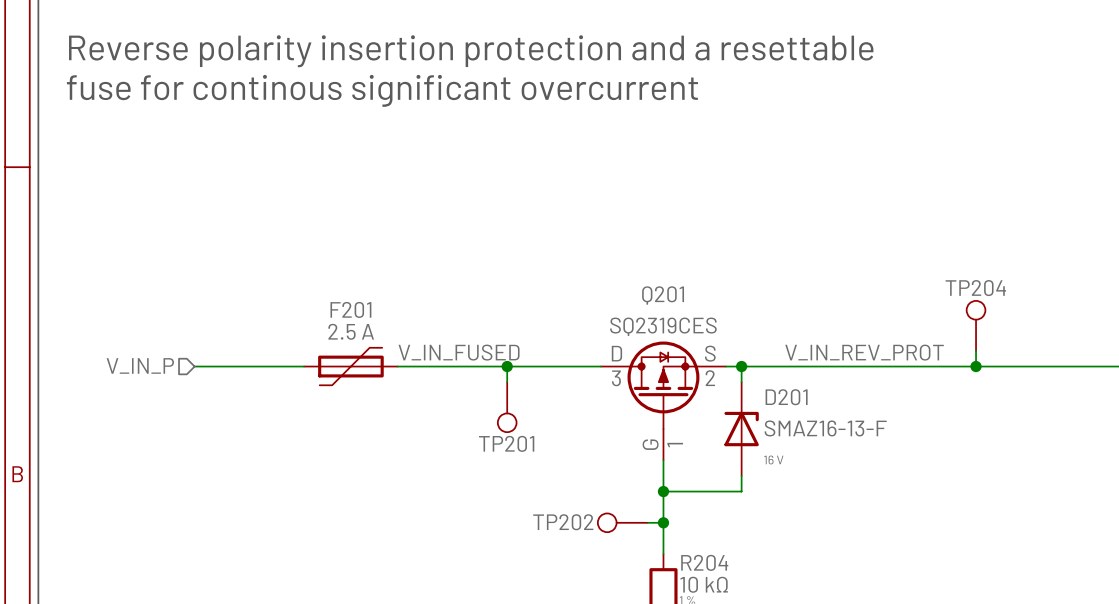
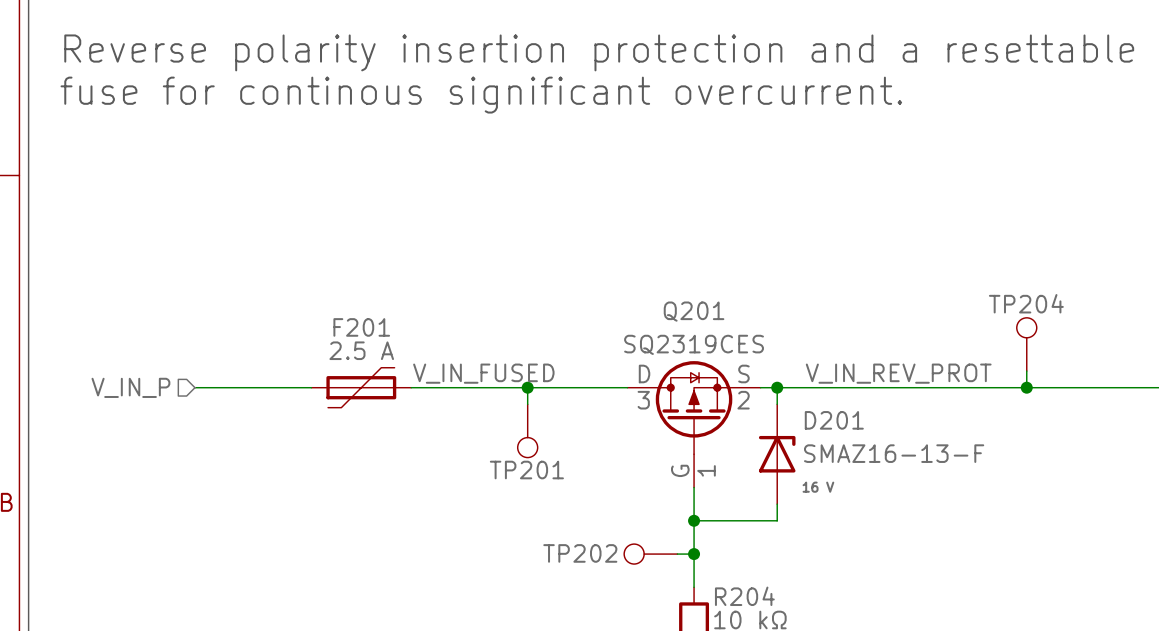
text: fuse for continous significant overcurrent (382, 90) -> fuse for continous significant overcurrent. (481, 95)

